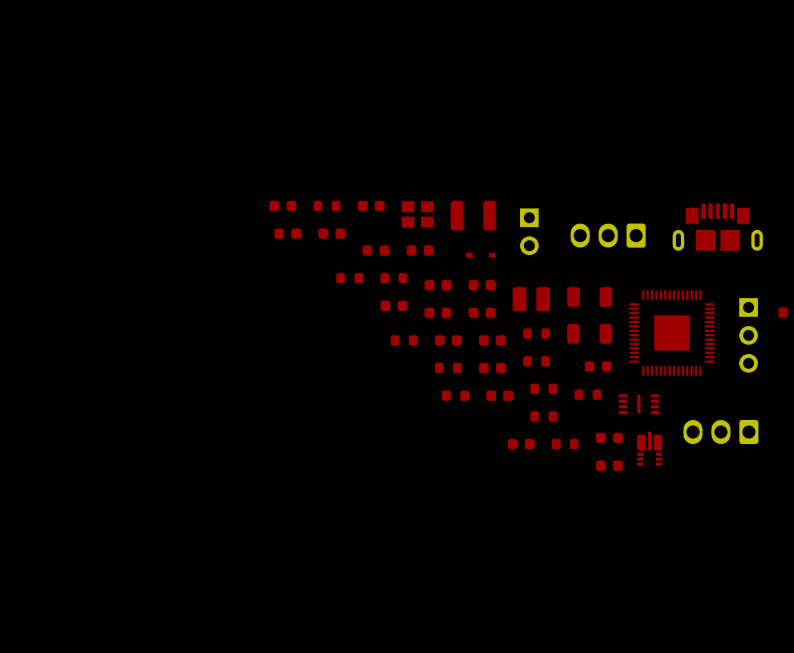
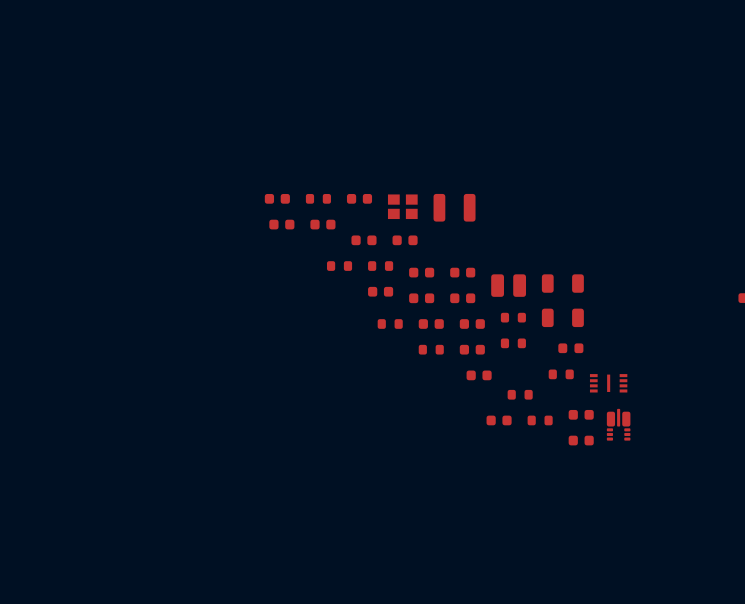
part: (717, 227) -> none
part: (529, 231) -> none
part: (608, 235) -> none
part: (480, 255) -> none
part: (671, 332) -> none
part: (748, 335) -> none
part: (543, 388) -> none
part: (455, 395) -> none
part: (720, 432) -> none

